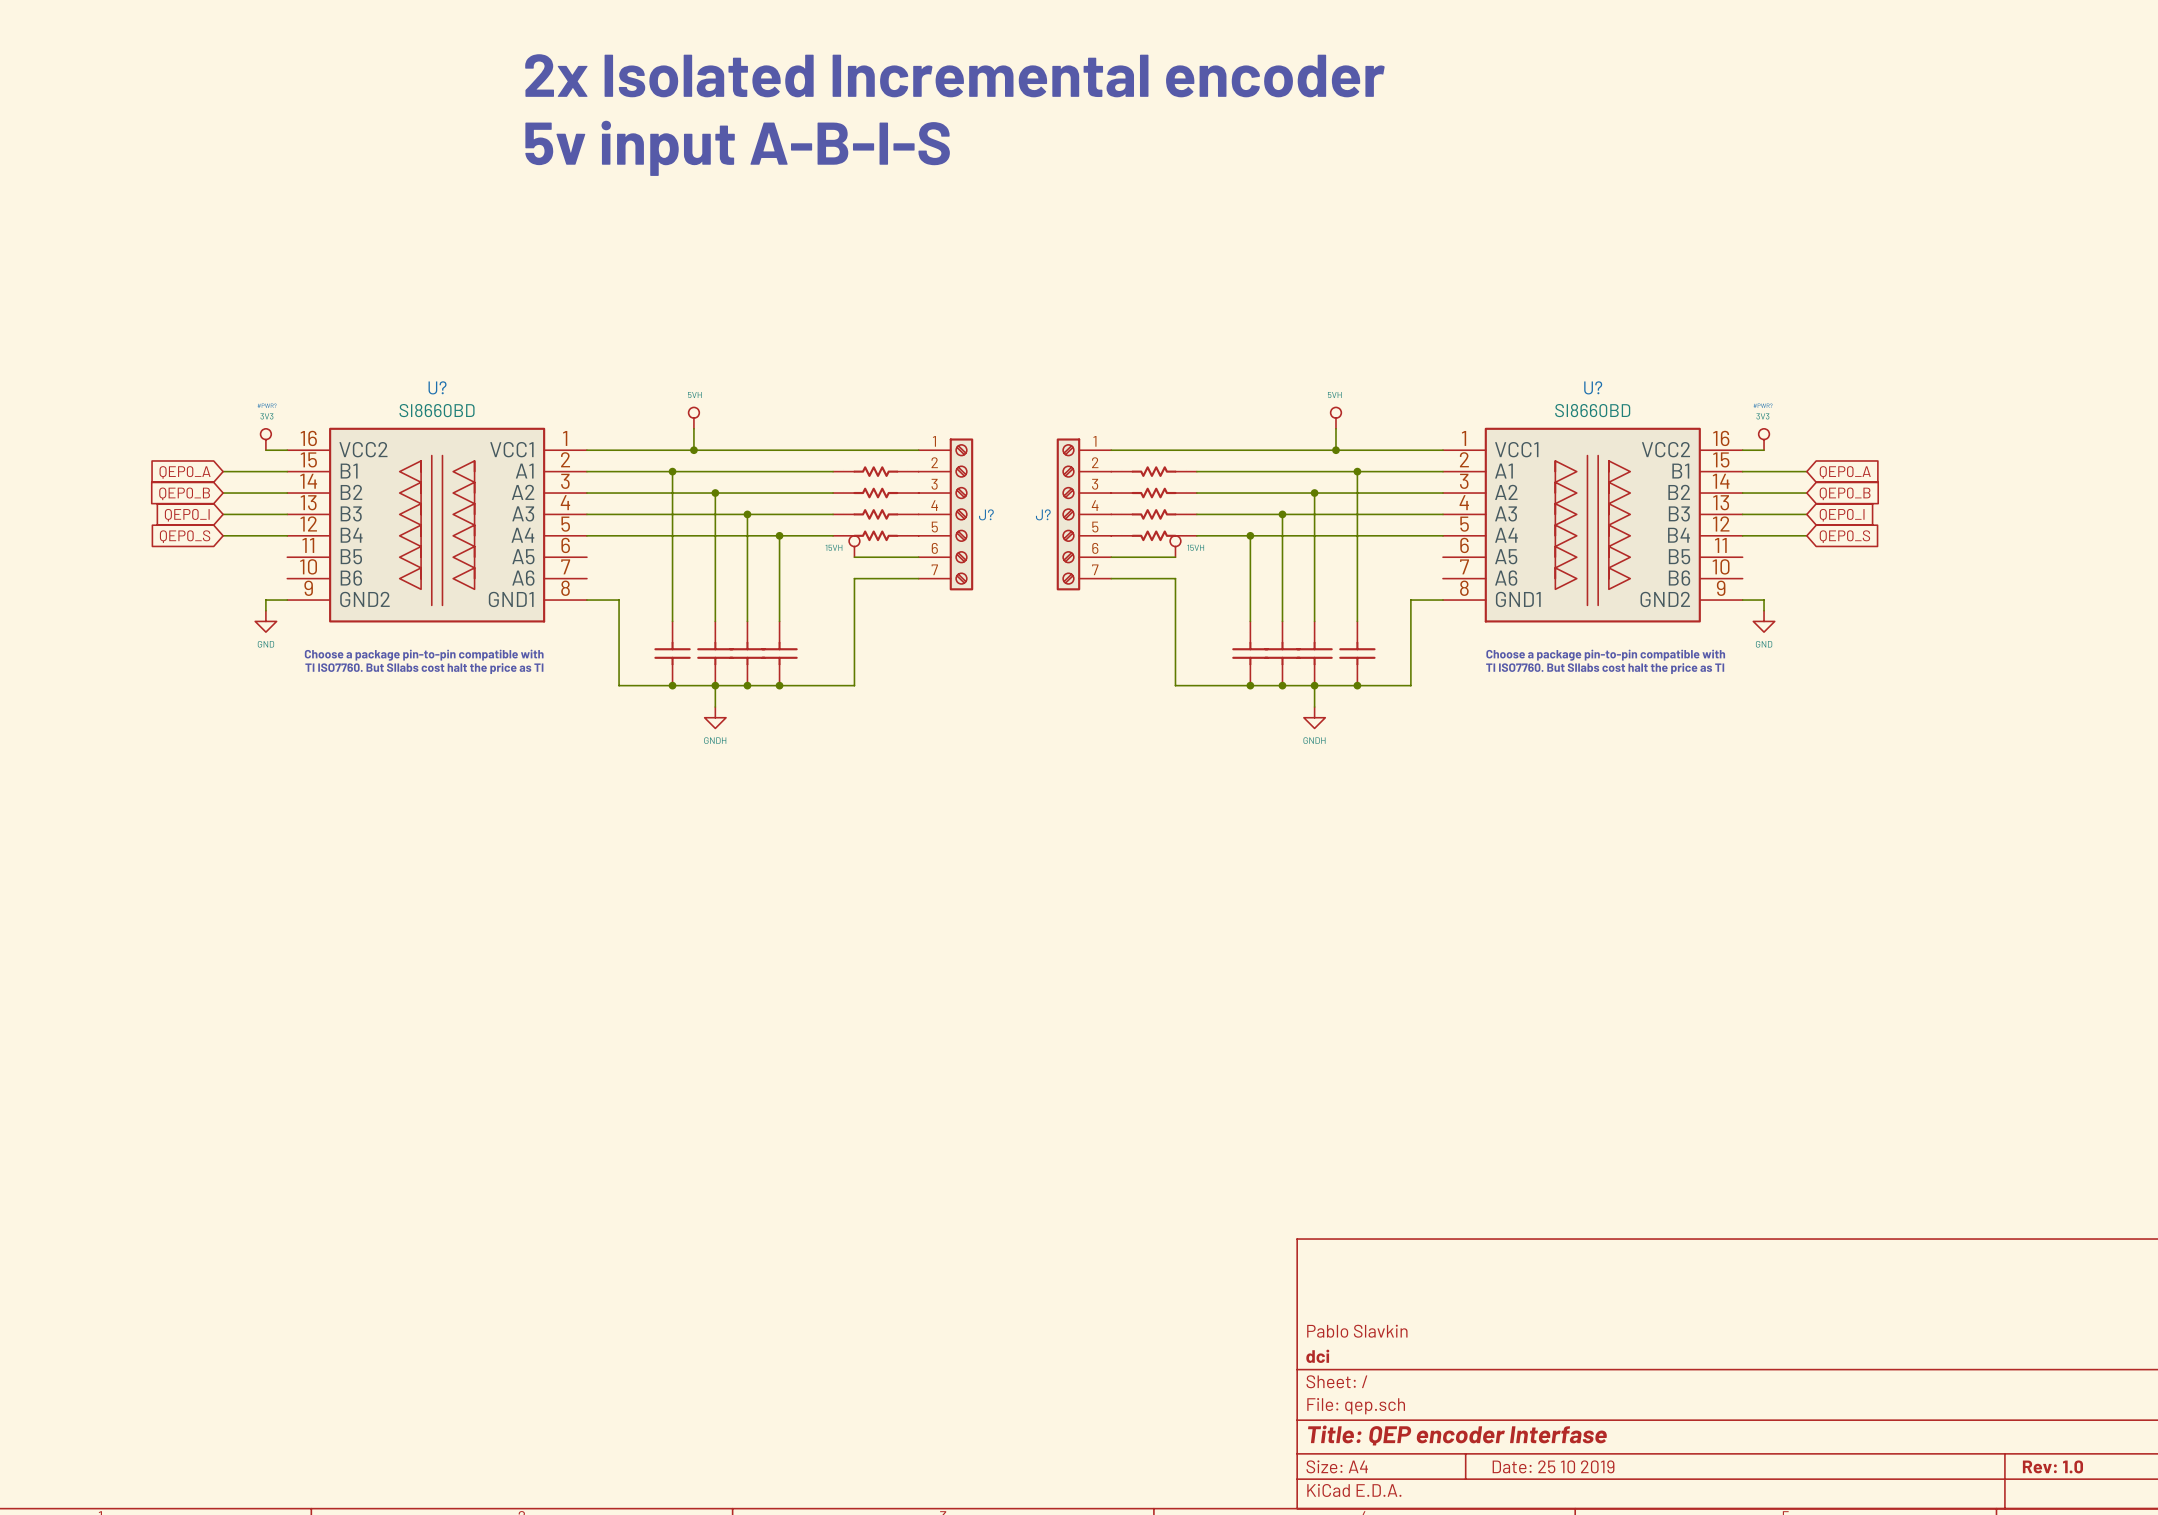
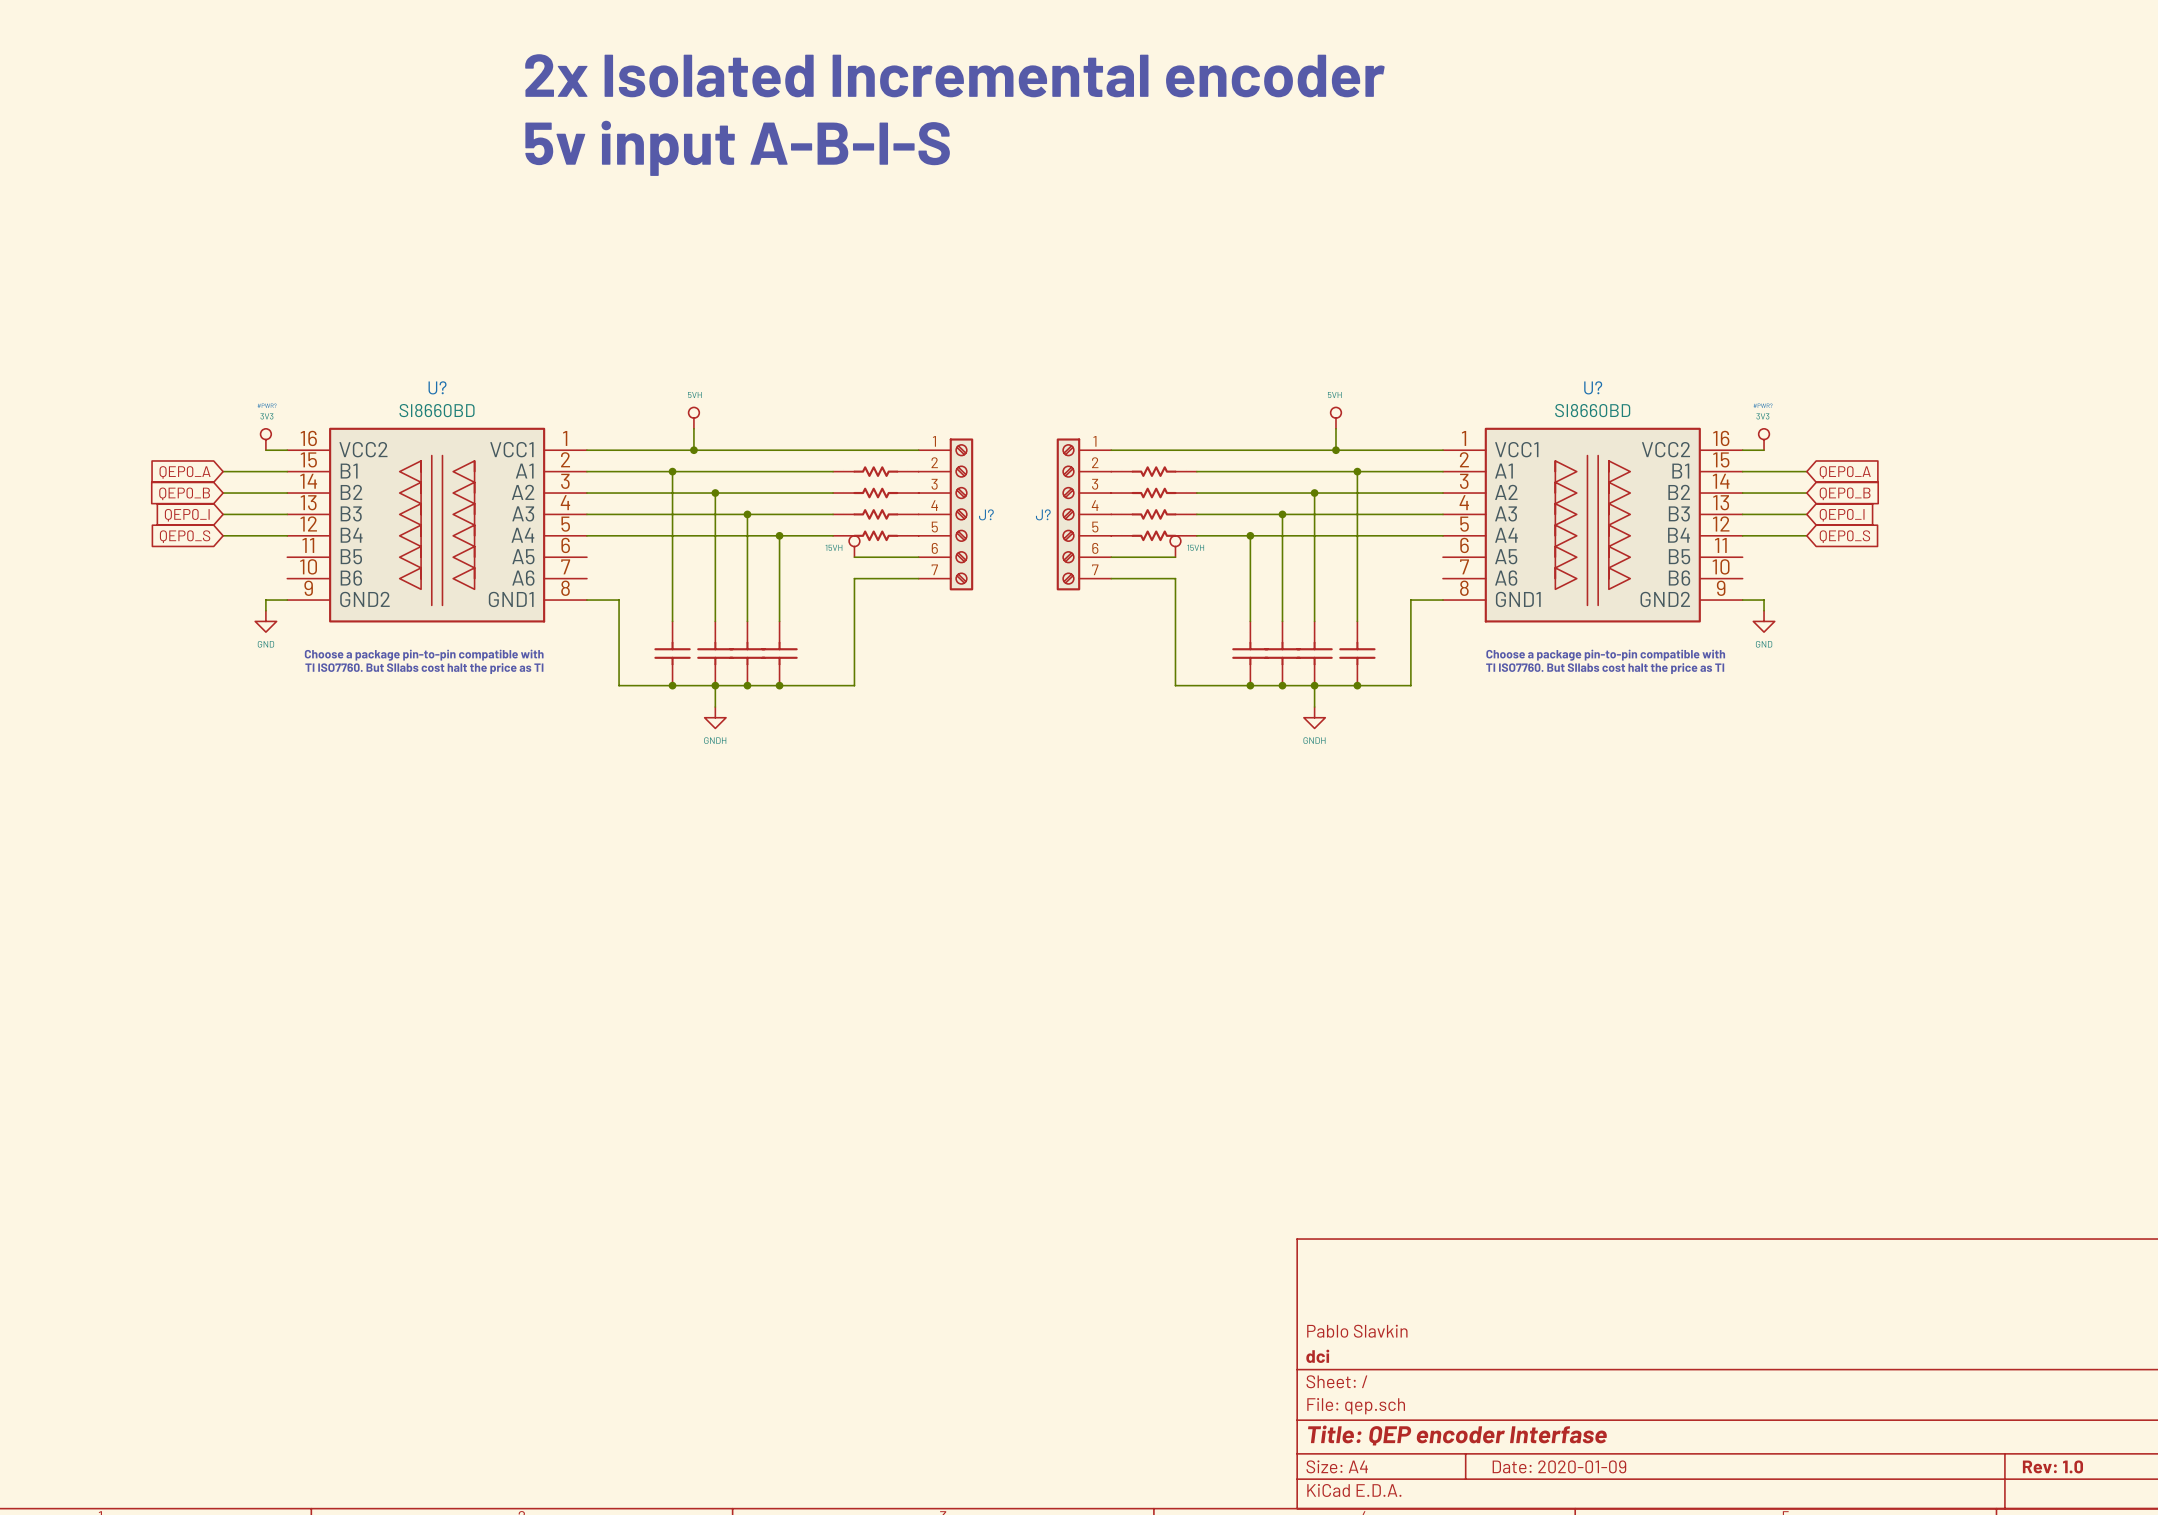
title block: Date: 25 10 2019 (1553, 1466) -> Date: 2020-01-09 (1559, 1466)

